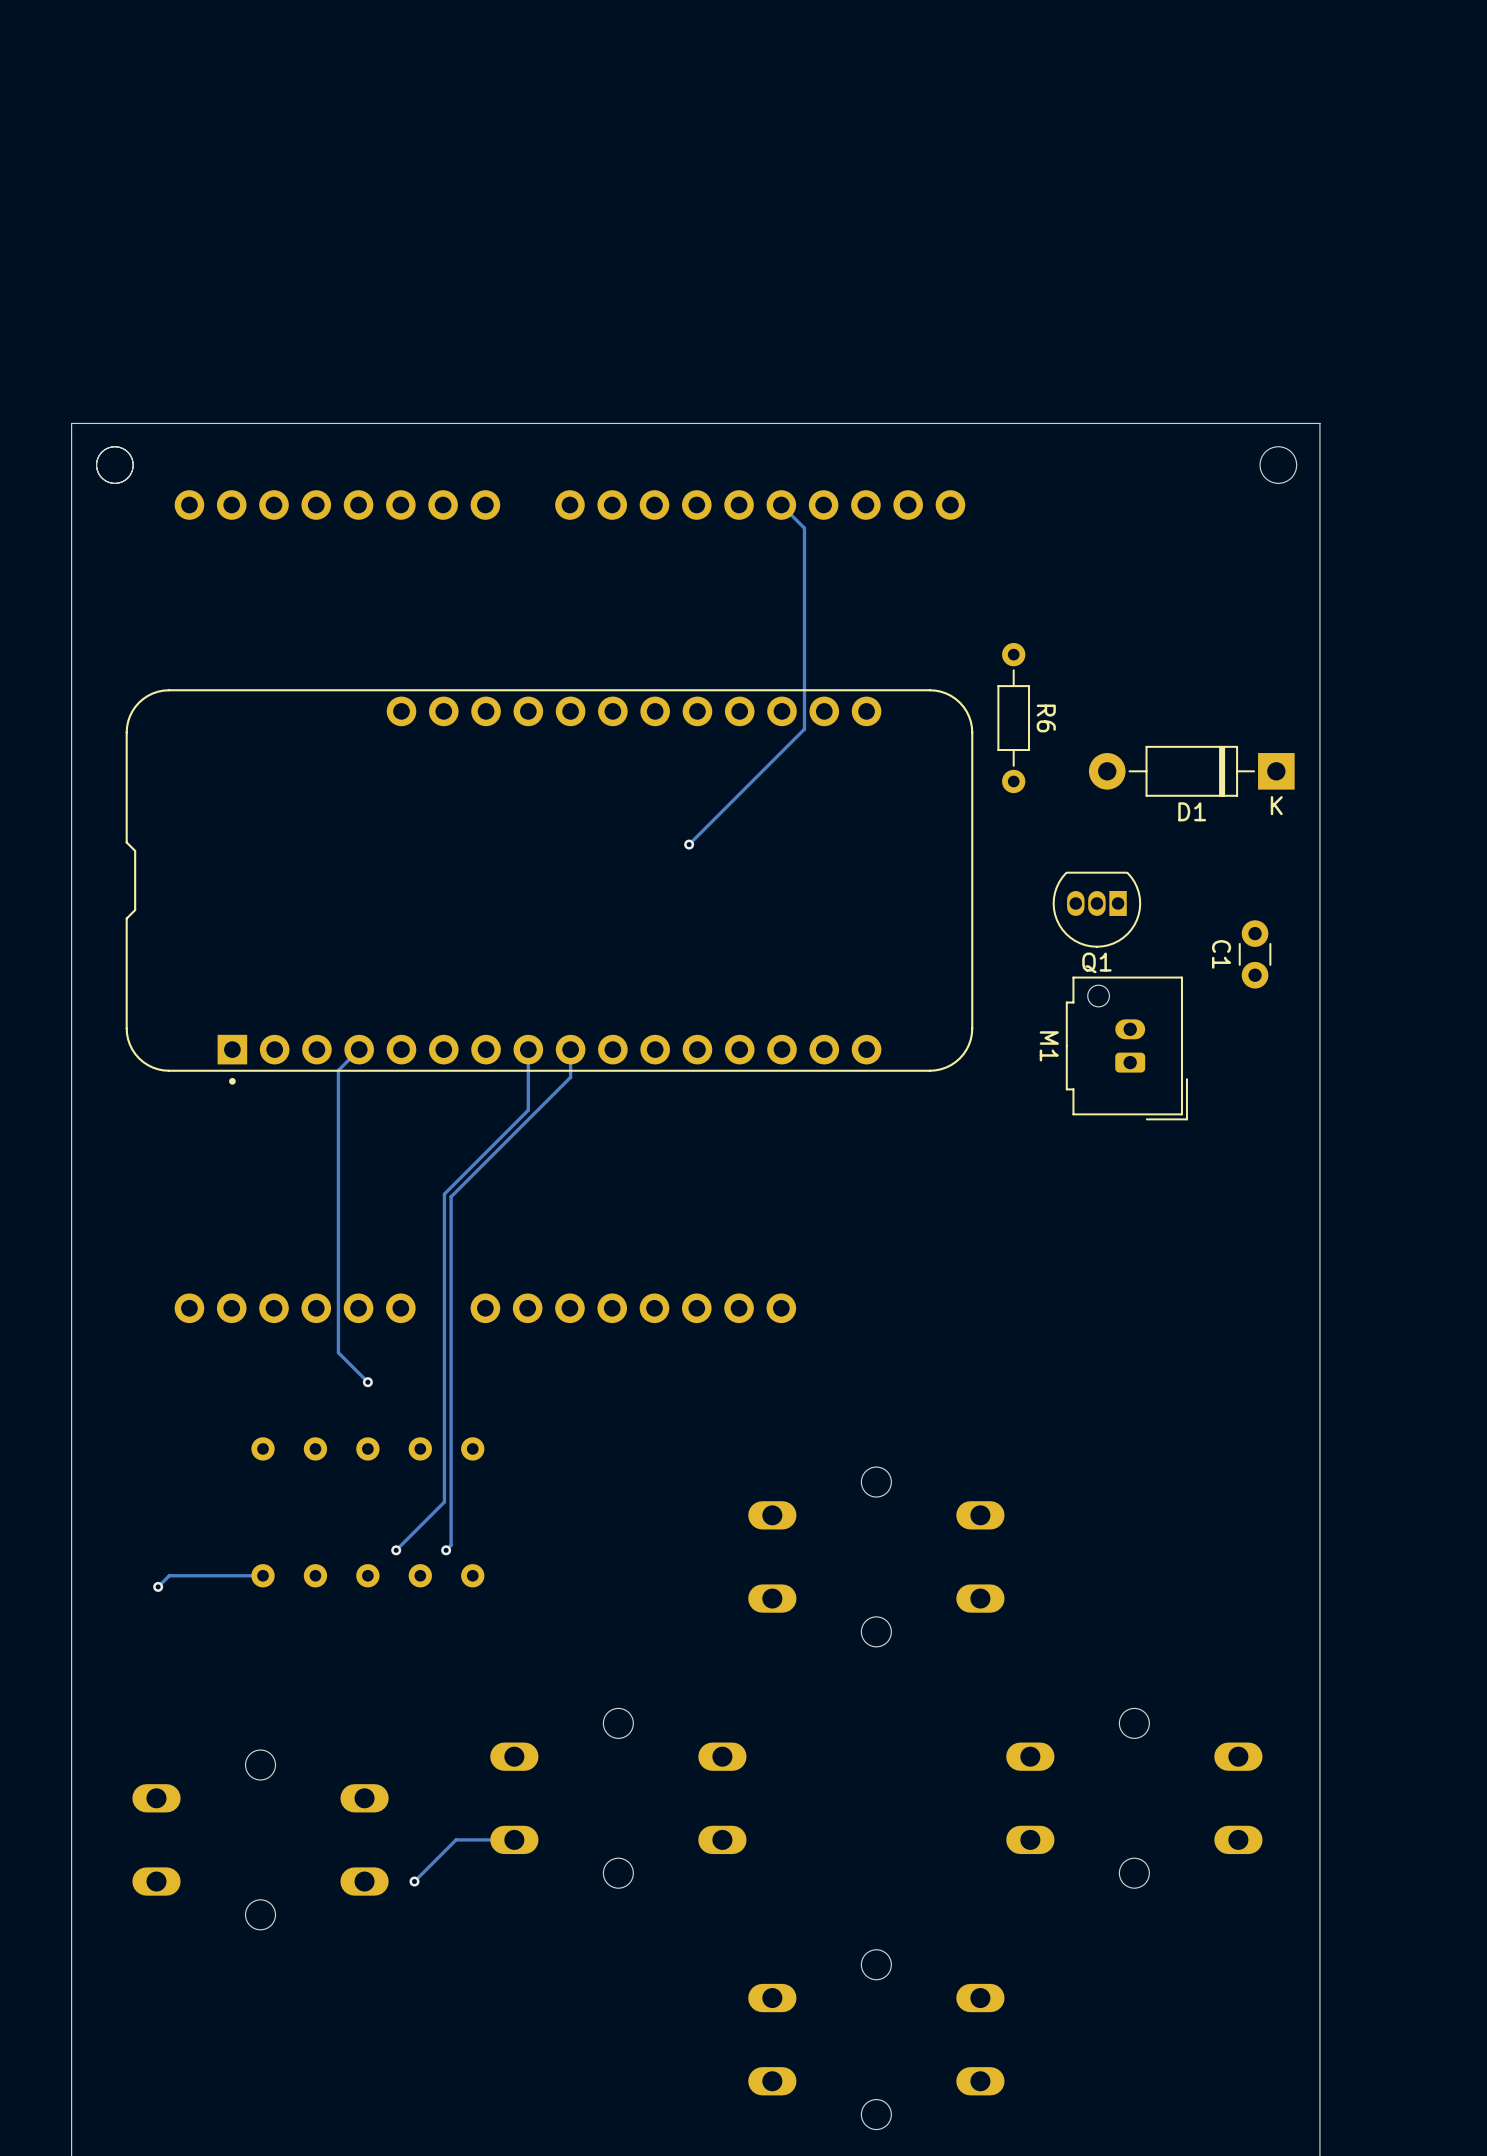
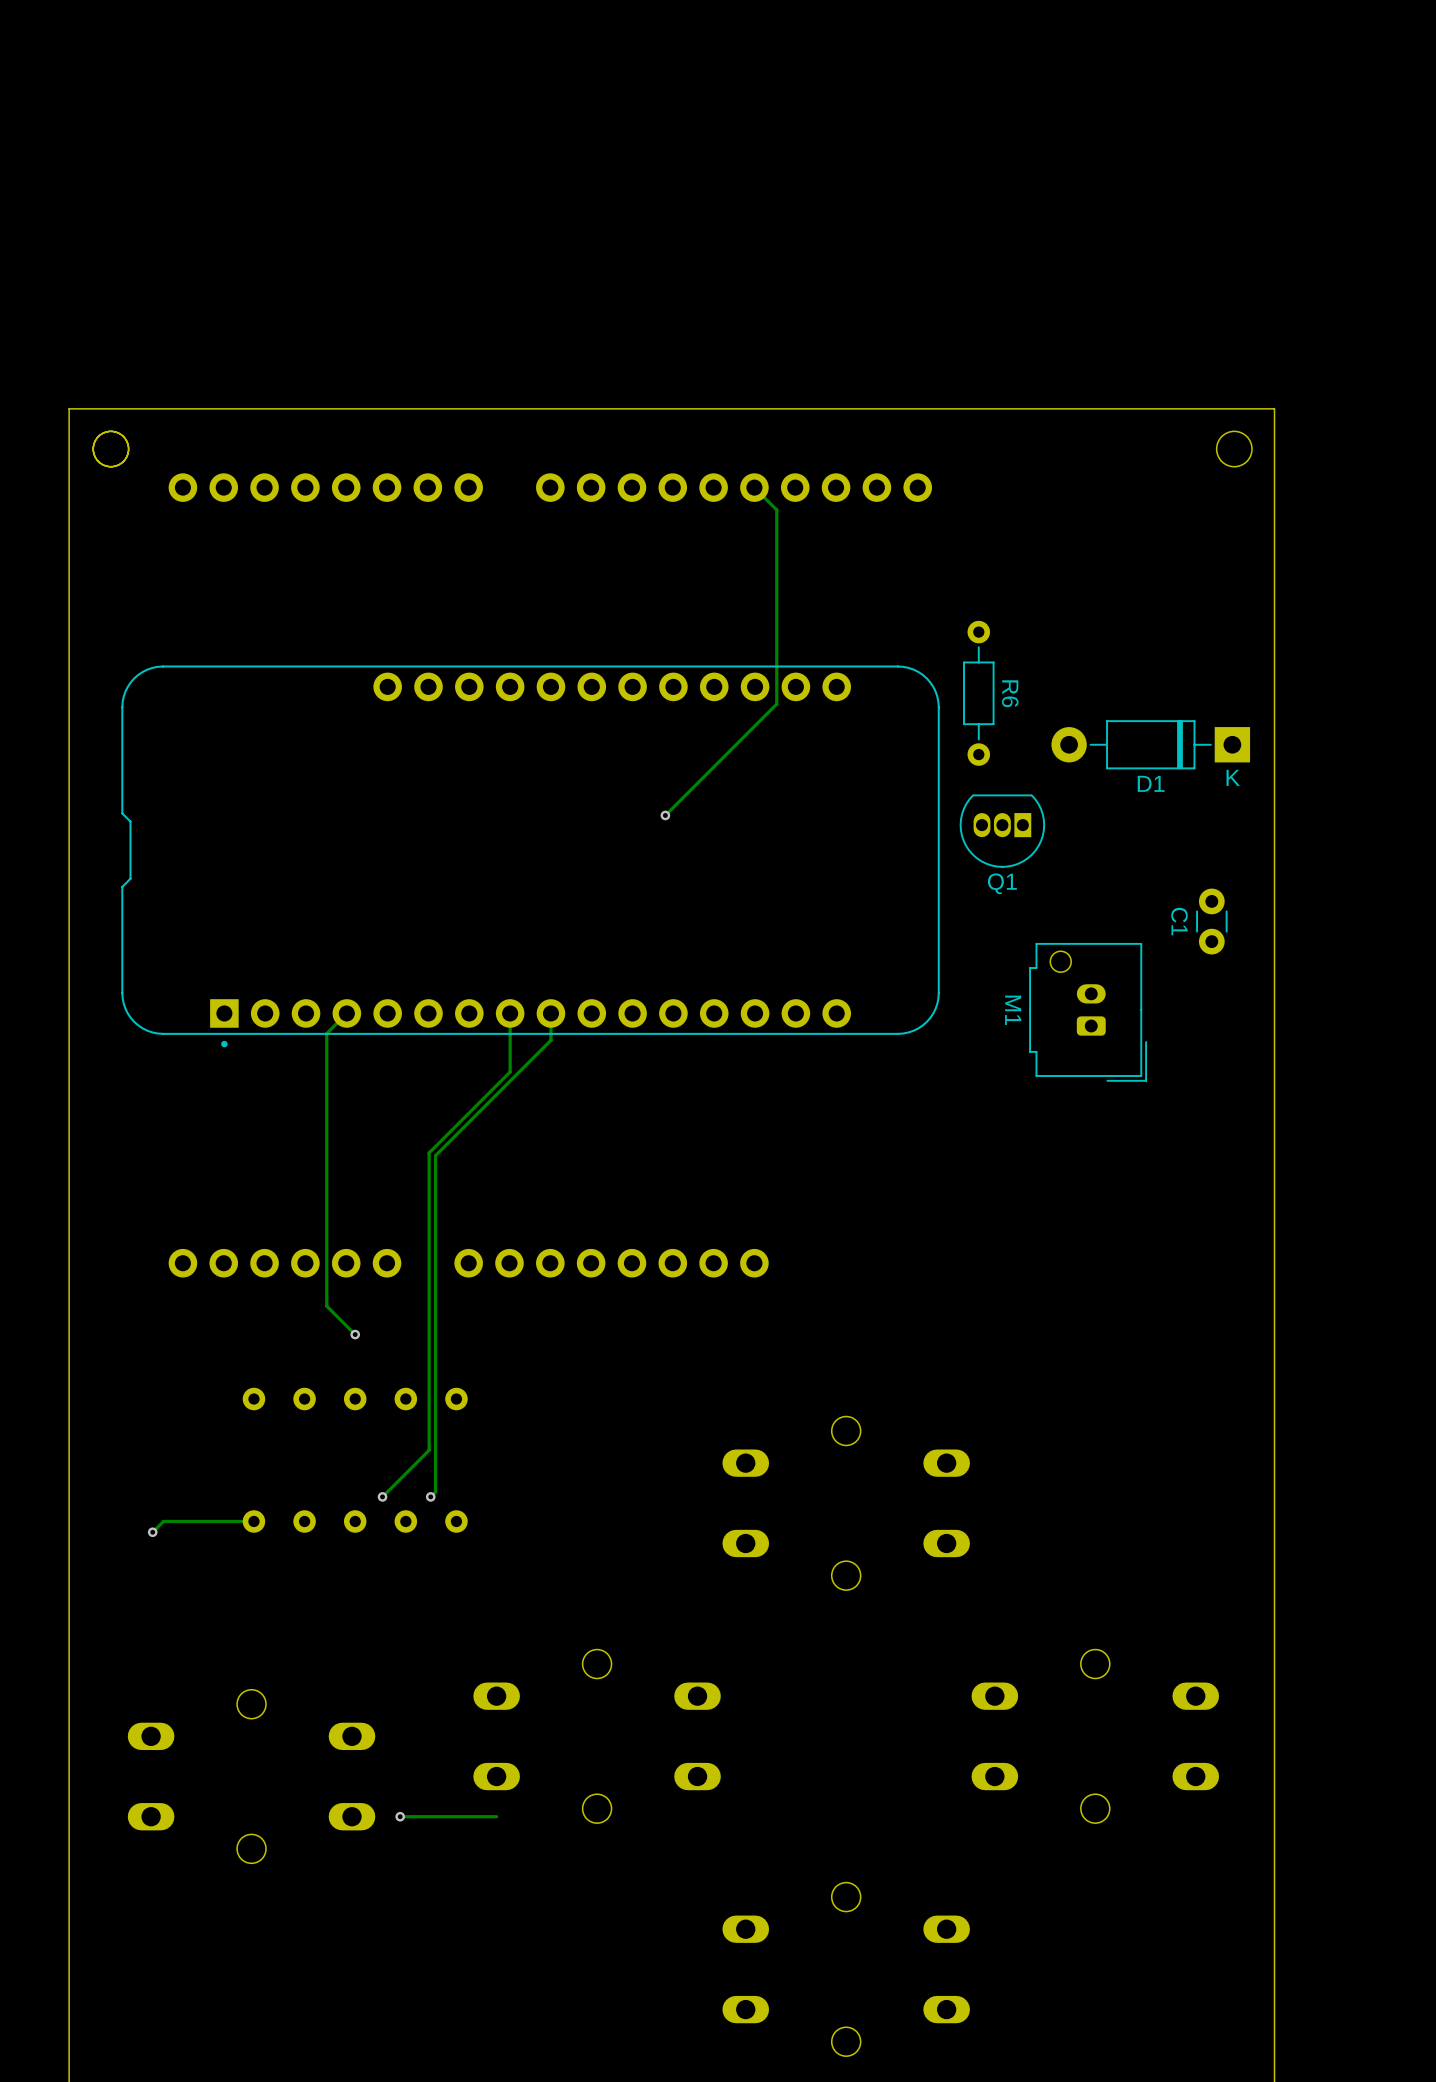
Q1 position: (1096, 909) -> (1002, 831)
track: (514, 1839) (456, 1839) (414, 1881) -> (496, 1816) (400, 1816)

